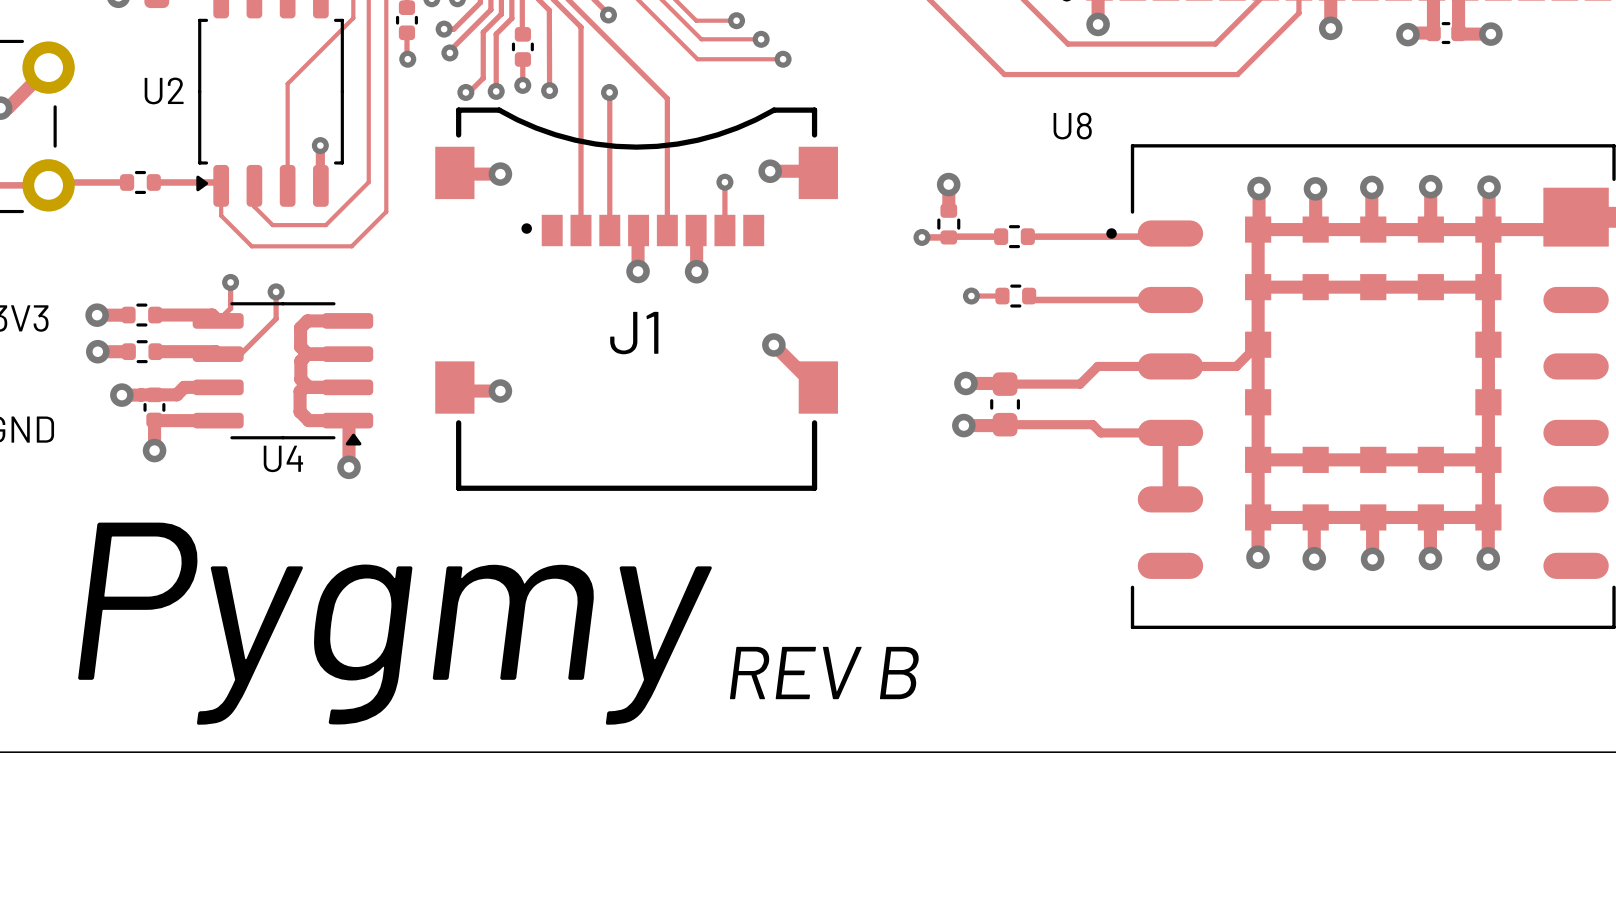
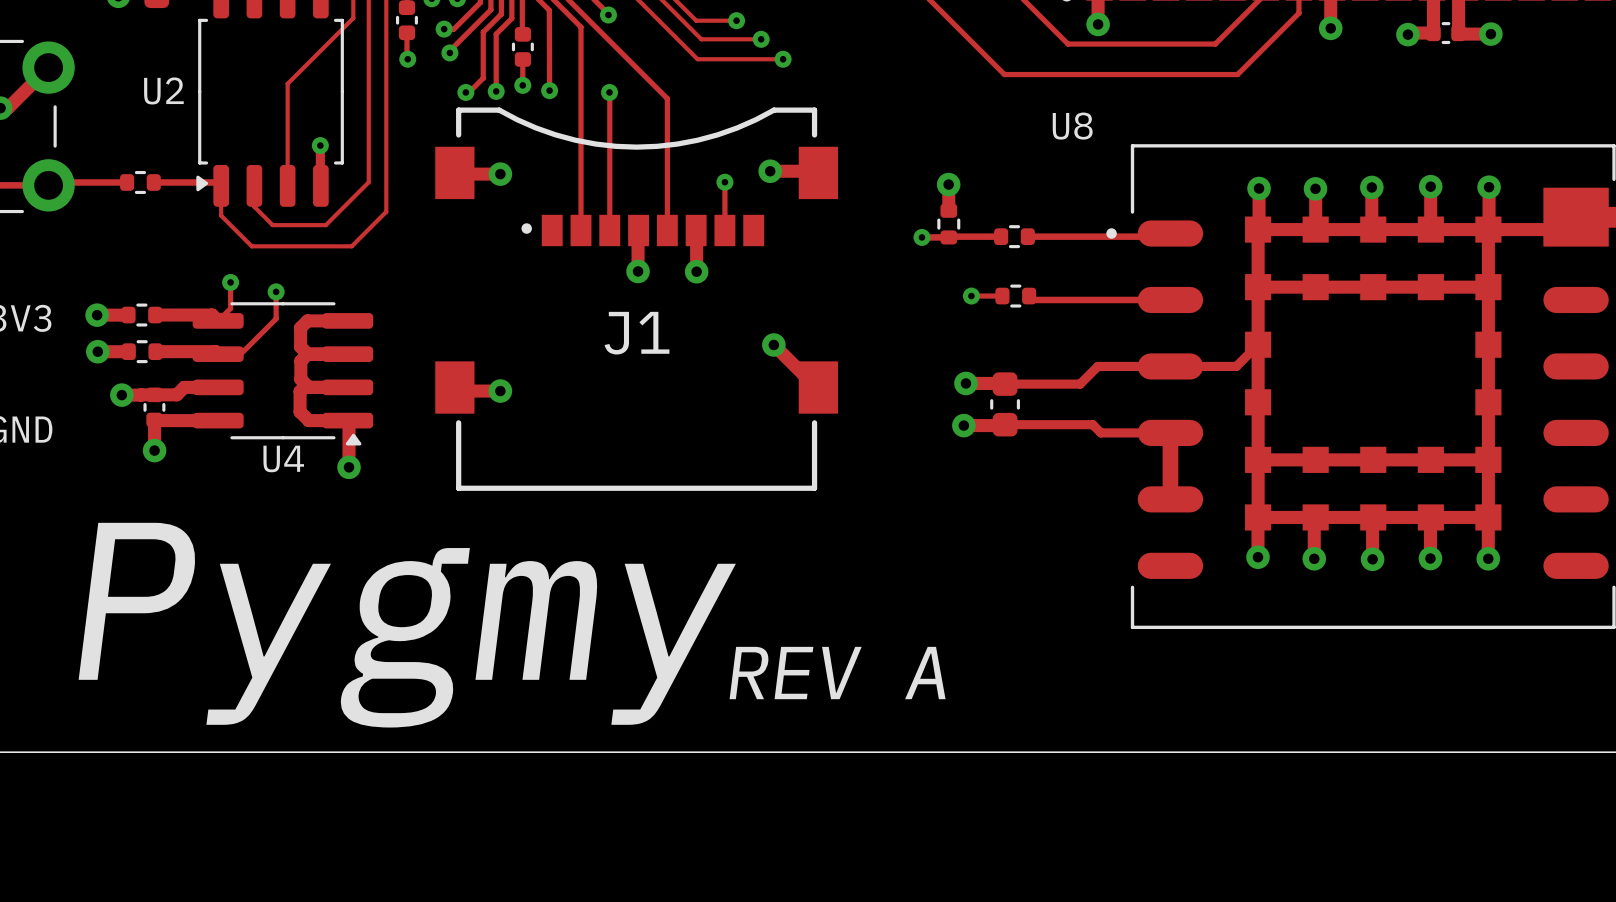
text: REV B (824, 673) -> REV A (837, 673)

